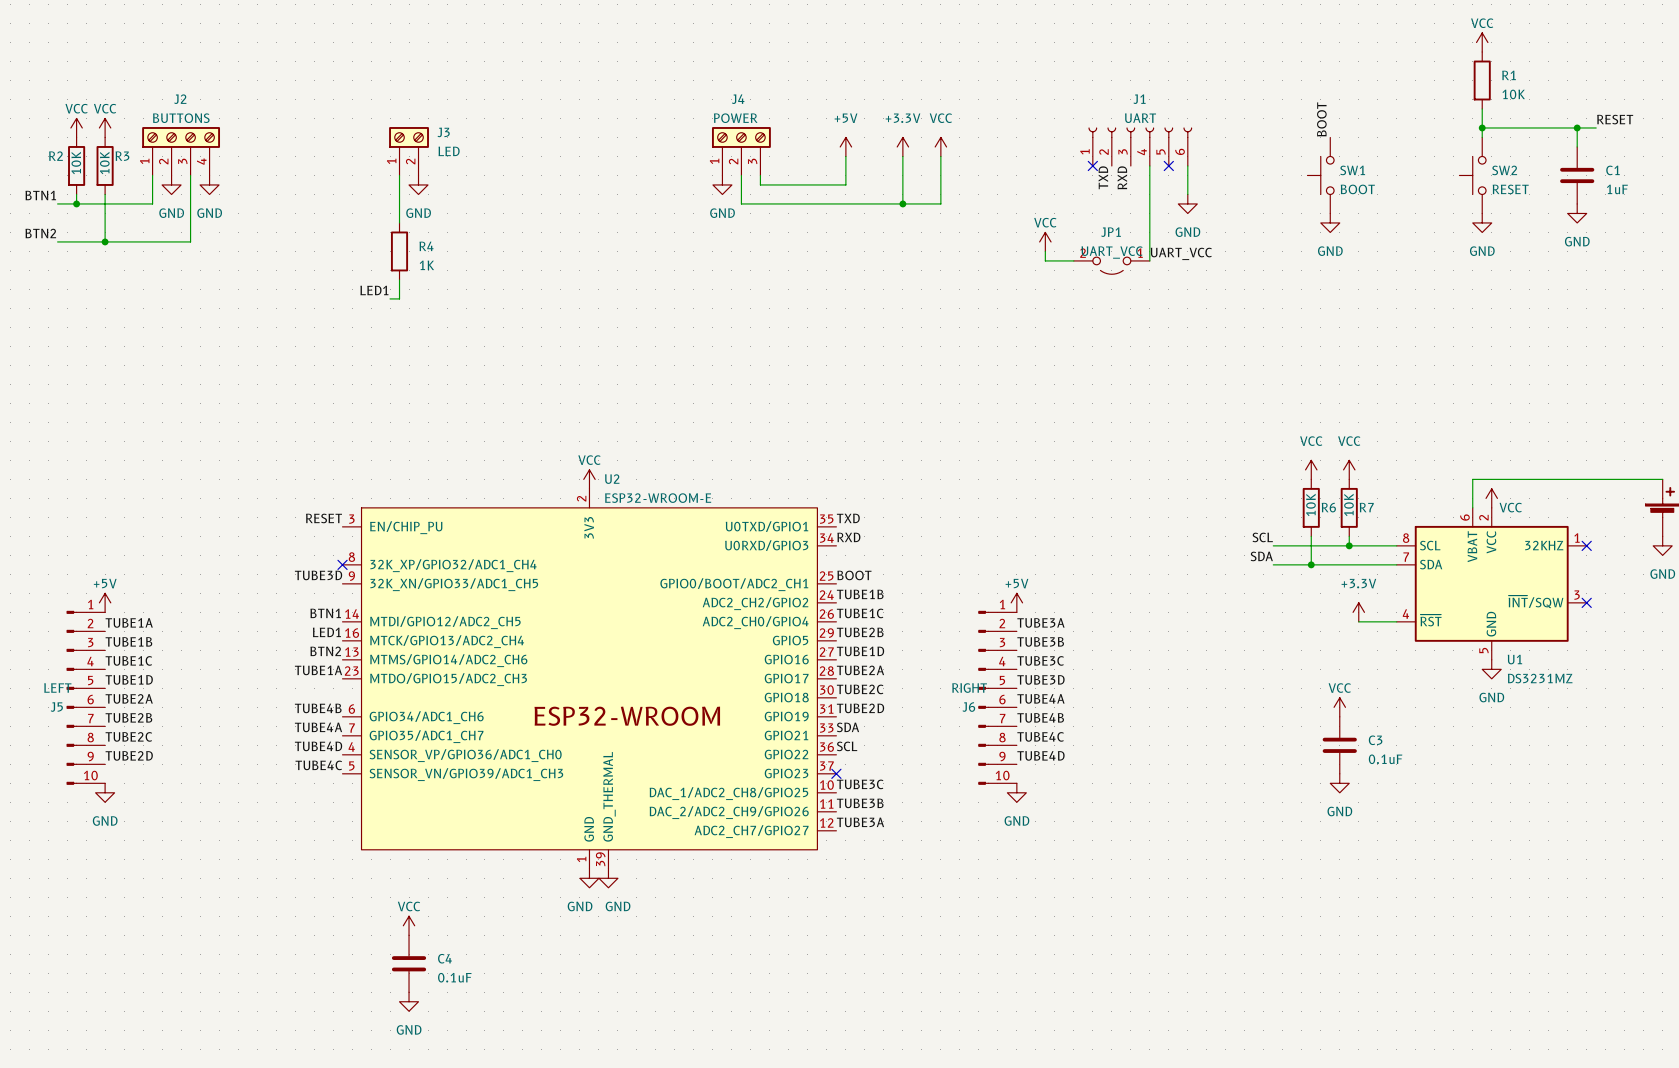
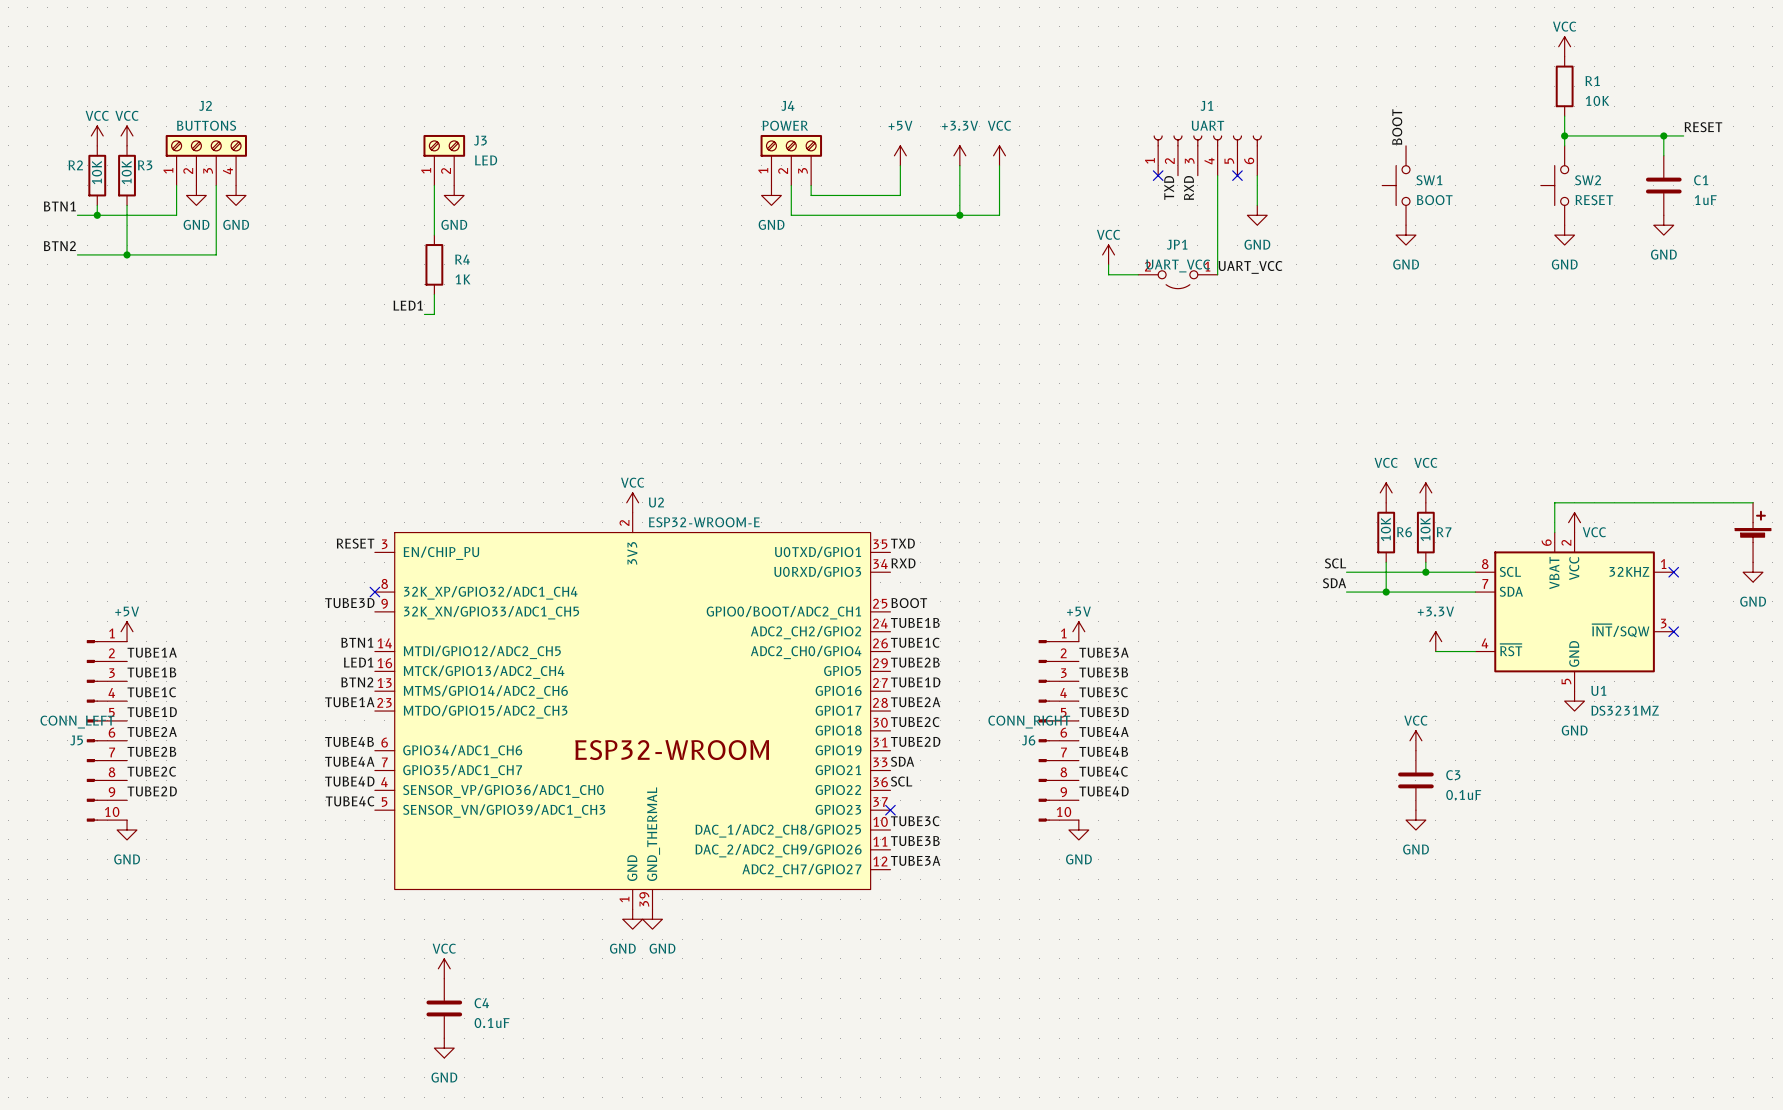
J5 value: LEFT (57, 687) -> CONN_LEFT (77, 722)
J6 value: RIGHT (969, 688) -> CONN_RIGHT (1029, 722)

